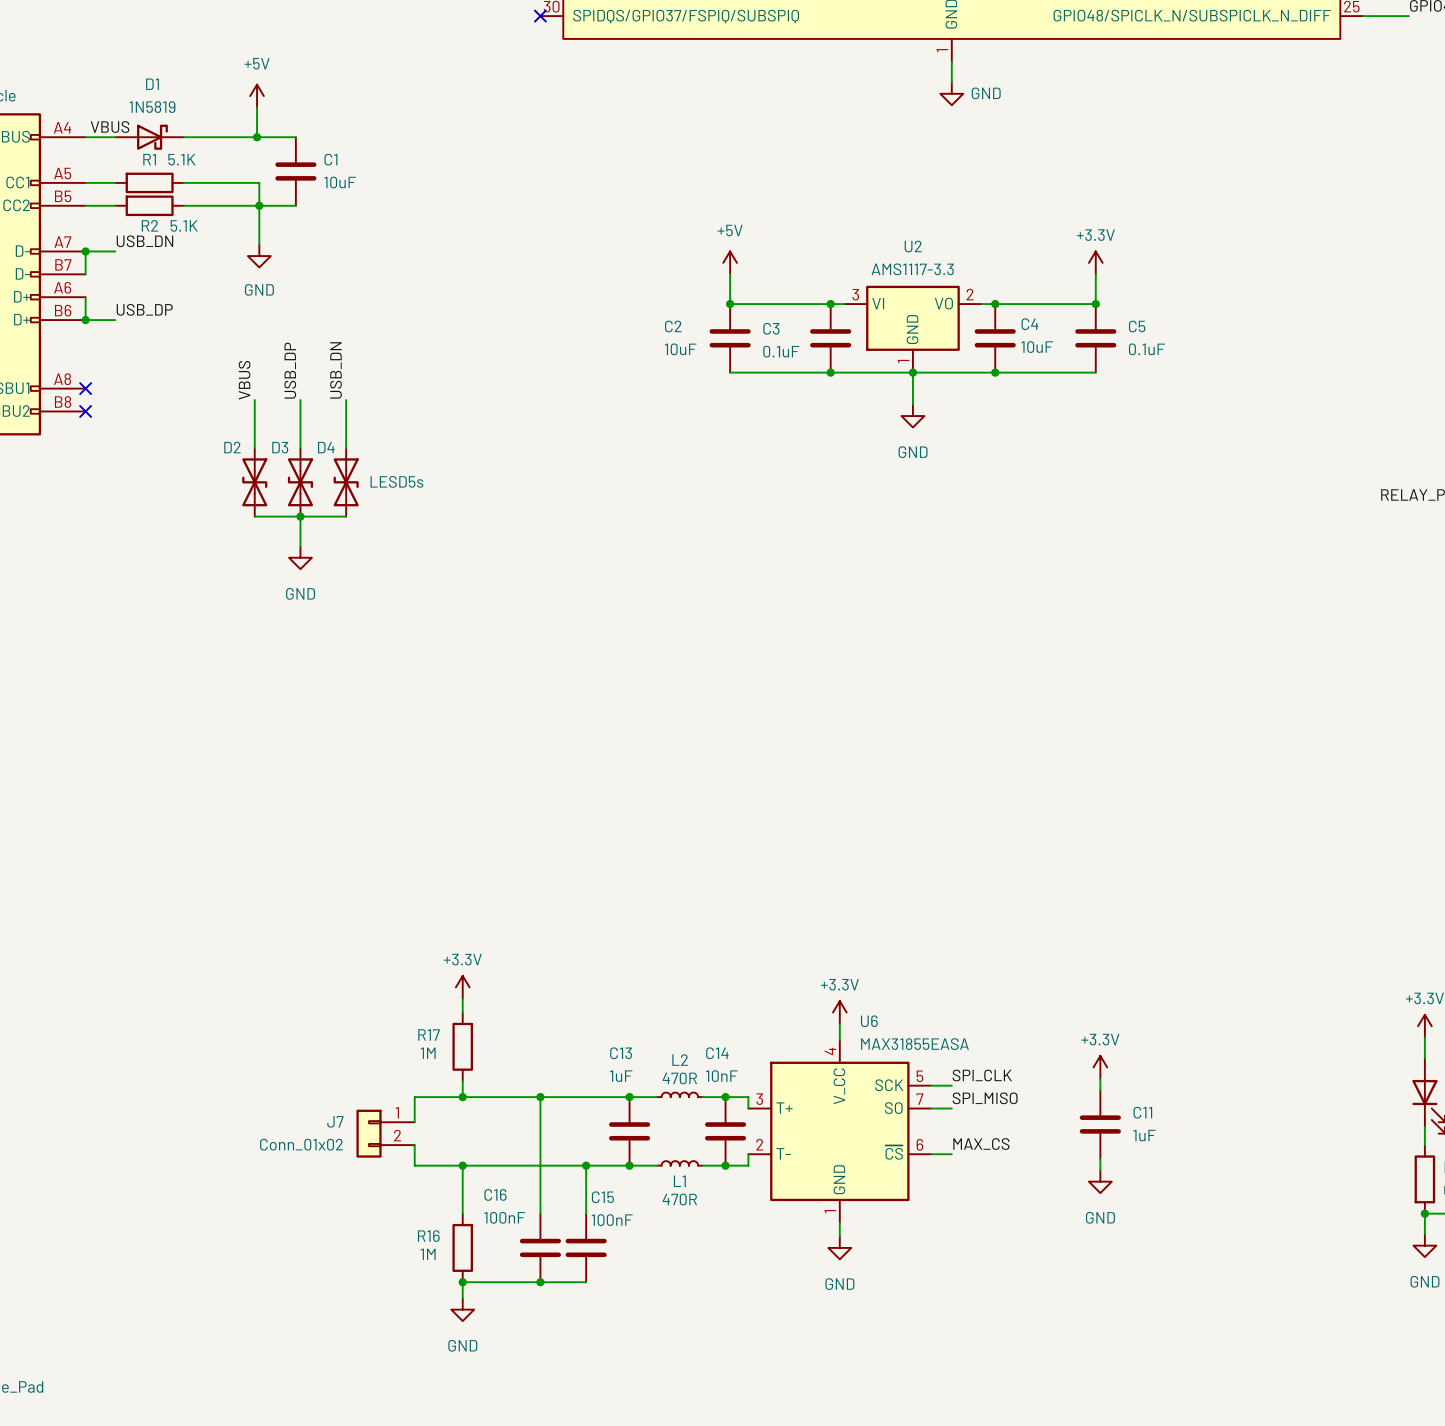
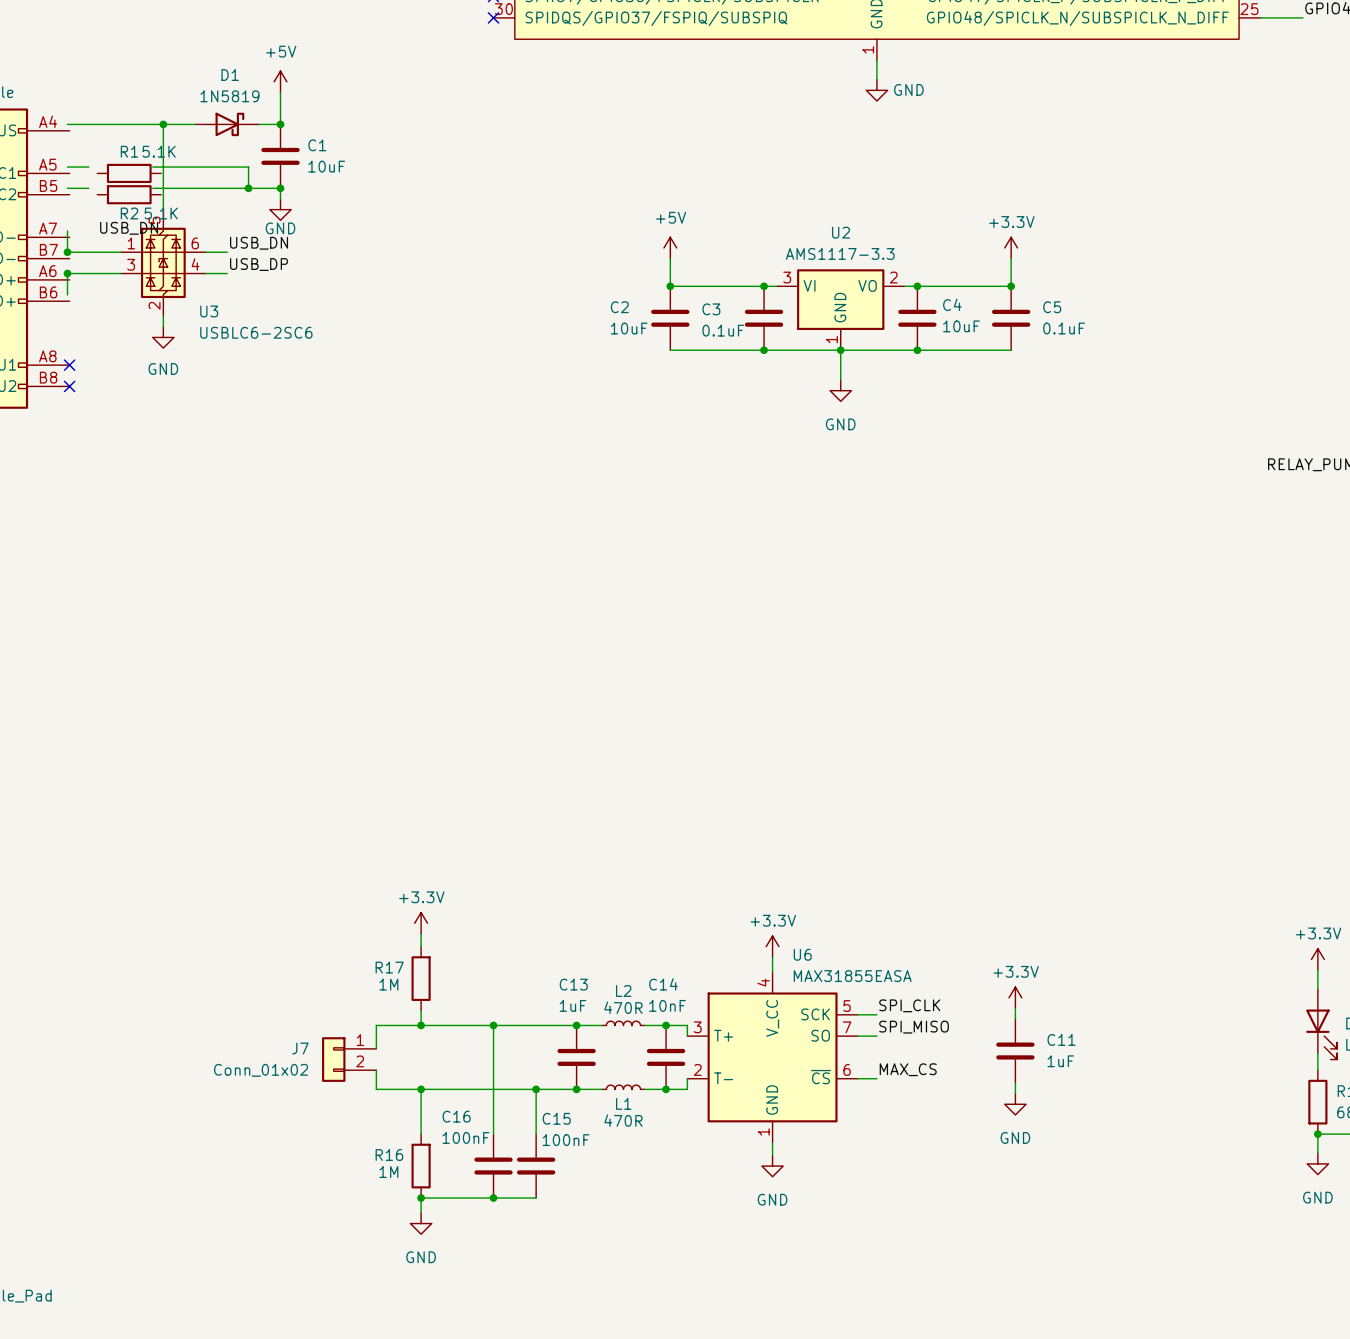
power symbol position: +5V (257, 96) -> +5V (280, 81)
wire: none -> (280, 92) (280, 124) (259, 124)
wire: (257, 107) (257, 137) -> none
label: VBUS (110, 127) -> none
wire: none -> (67, 124) (195, 124)
wire: none -> (163, 124) (163, 209)
junction: none -> (163, 124)
junction: none -> (280, 124)
wire: (85, 137) (115, 137) -> none
D1 position: (149, 137) -> (227, 124)
wire: (183, 137) (295, 137) -> none
junction: (257, 137) -> none
C1 position: (295, 171) -> (280, 156)
wire: none -> (67, 167) (88, 167)
wire: none -> (152, 167) (248, 167) (248, 188)
wire: (85, 182) (115, 182) -> none
wire: (183, 182) (259, 182) (259, 244) -> none
wire: none -> (67, 188) (88, 188)
wire: none -> (152, 188) (280, 188) (280, 198)
junction: none -> (280, 188)
wire: (85, 205) (115, 205) -> none
wire: (183, 205) (295, 205) -> none
junction position: (259, 205) -> (248, 188)
wire: none -> (67, 230) (67, 252) (120, 252)
junction position: (85, 251) -> (67, 252)
wire: (115, 251) (85, 251) (85, 274) -> none
power symbol position: GND (259, 256) -> GND (280, 209)
wire: none -> (205, 252) (227, 252)
U3: none -> USBLC6-2SC6 (163, 262)
label: none -> USB_DP (259, 264)
power symbol text position: GND (259, 289) -> GND (280, 228)
junction: none -> (67, 273)
wire: none -> (120, 273) (67, 273) (67, 294)
wire: none -> (205, 273) (227, 273)
wire: (85, 297) (85, 320) (115, 320) -> none
label: USB_DP (144, 309) -> none
junction: (85, 320) -> none
wire: none -> (163, 316) (163, 326)
power symbol: none -> GND (163, 337)
label: USB_DP (290, 370) -> none
label rotation: 0° (335, 370) -> 90° clockwise (259, 243)
label position: USB_DN (335, 370) -> USB_DN (259, 243)
label: VBUS (244, 380) -> none
wire: (254, 400) (254, 448) -> none
wire: (300, 400) (300, 448) -> none
wire: (346, 400) (346, 448) -> none
D2: (254, 482) -> none
D3: (300, 482) -> none
D4: LESD5s (346, 482) -> none
wire: (254, 516) (346, 516) -> none
wire: (300, 516) (300, 546) -> none
junction: (300, 516) -> none
power symbol: GND (300, 557) -> none

